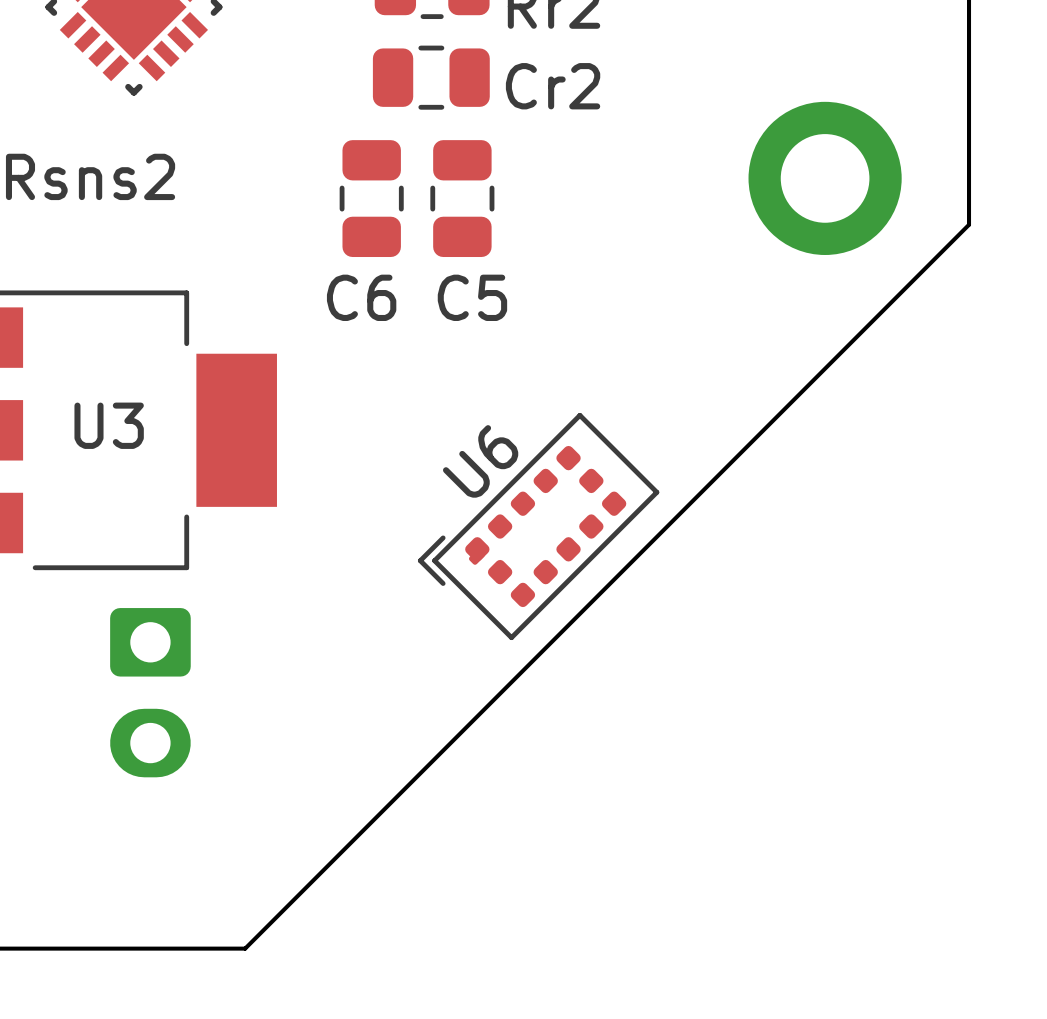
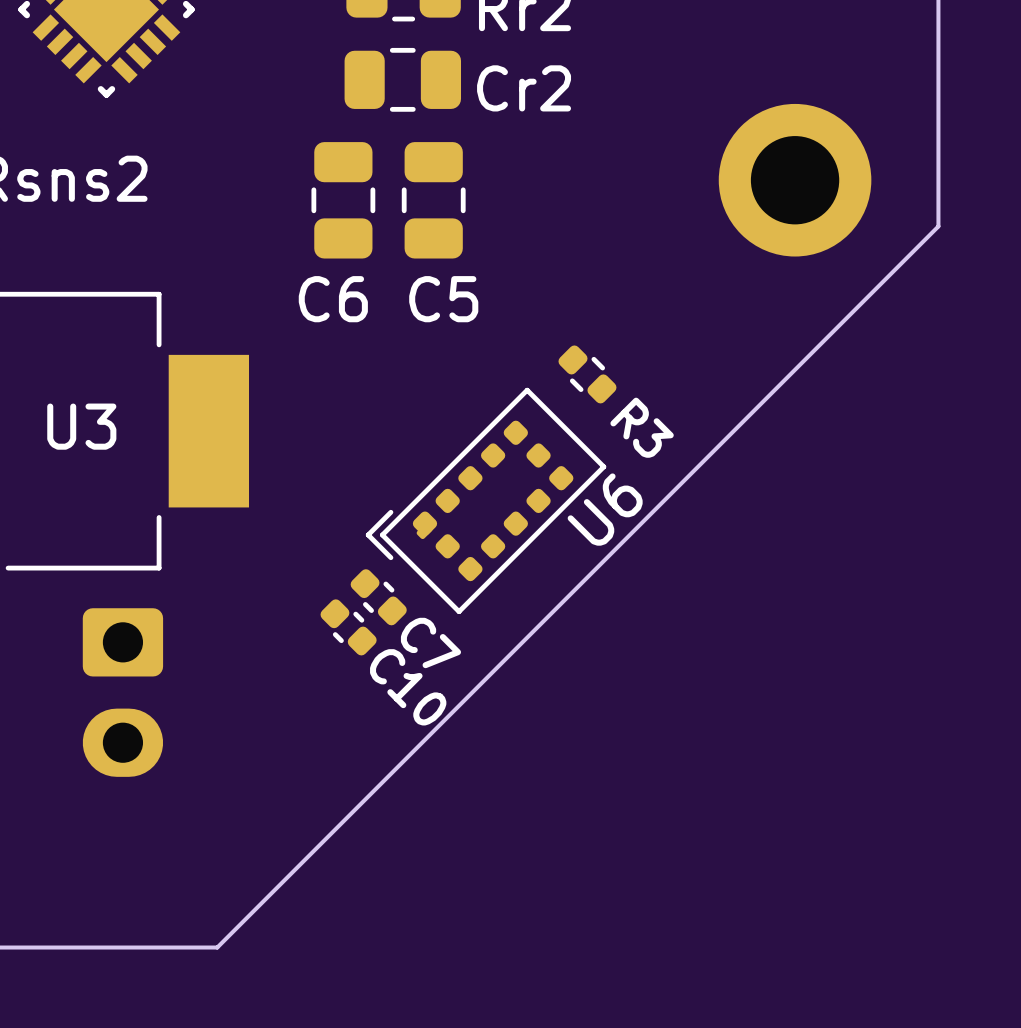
R3: none -> (587, 374)
U6 name position: U6 (480, 461) -> U6 (605, 509)
U6 position: (538, 526) -> (486, 500)
C7: none -> (378, 597)
C10: none -> (348, 627)

